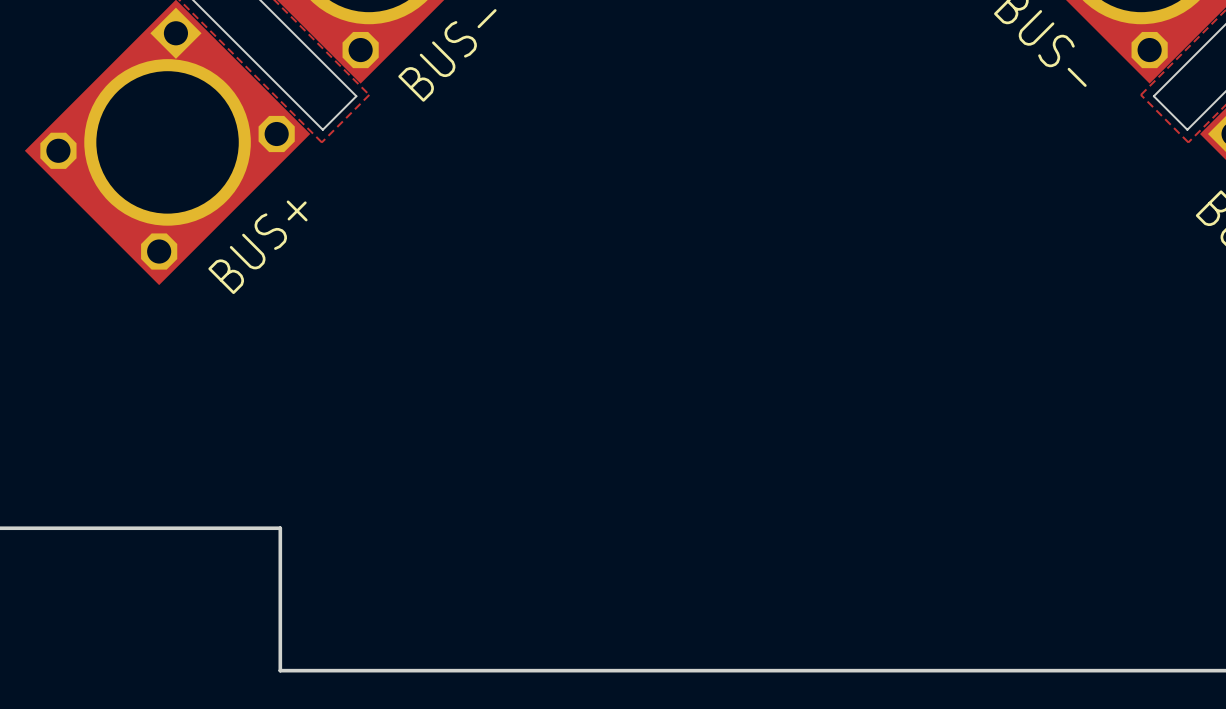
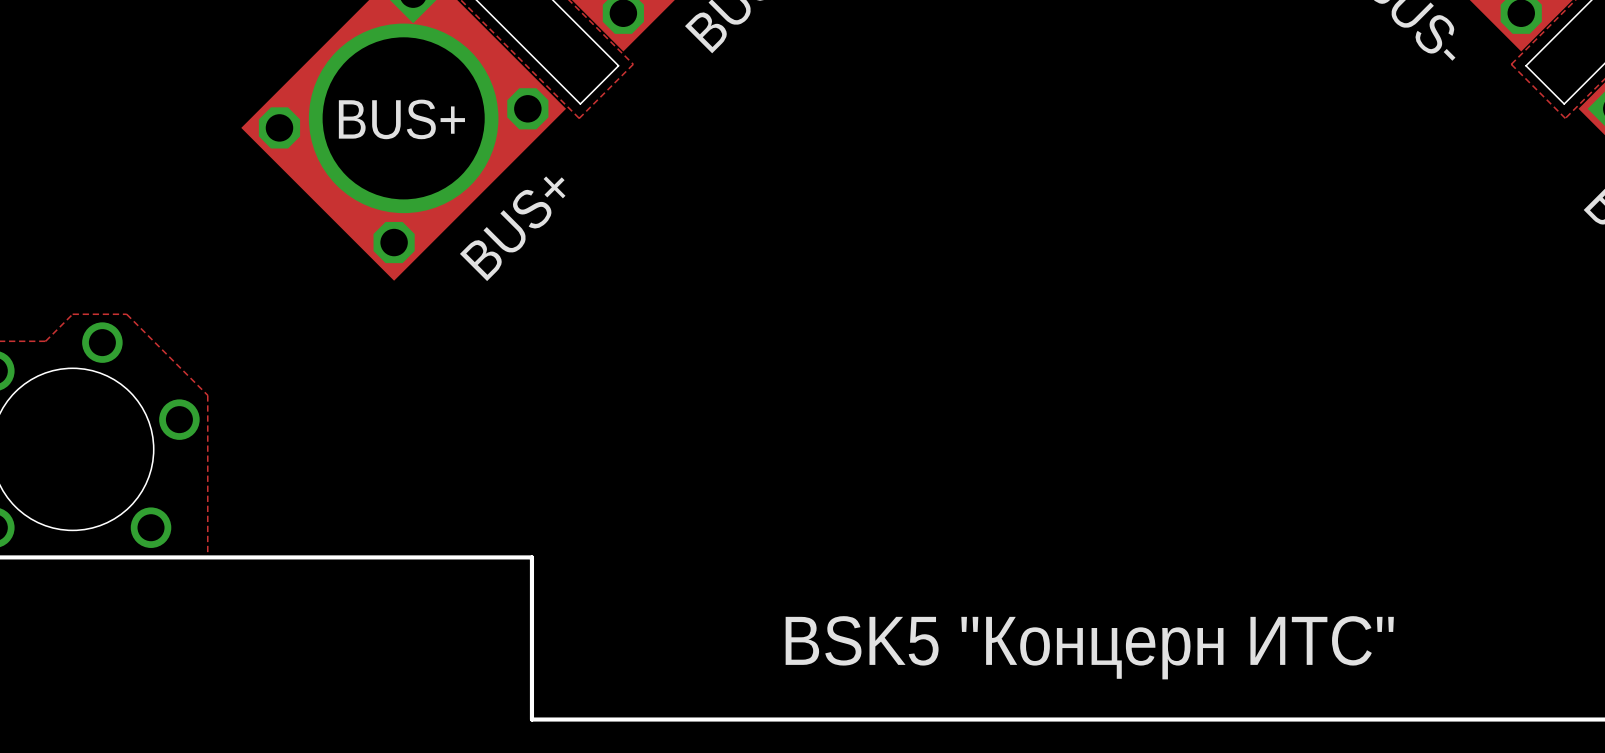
text: none -> BUS+ (401, 119)
text: none -> BSK5 "Концерн ИТС" (1089, 647)

